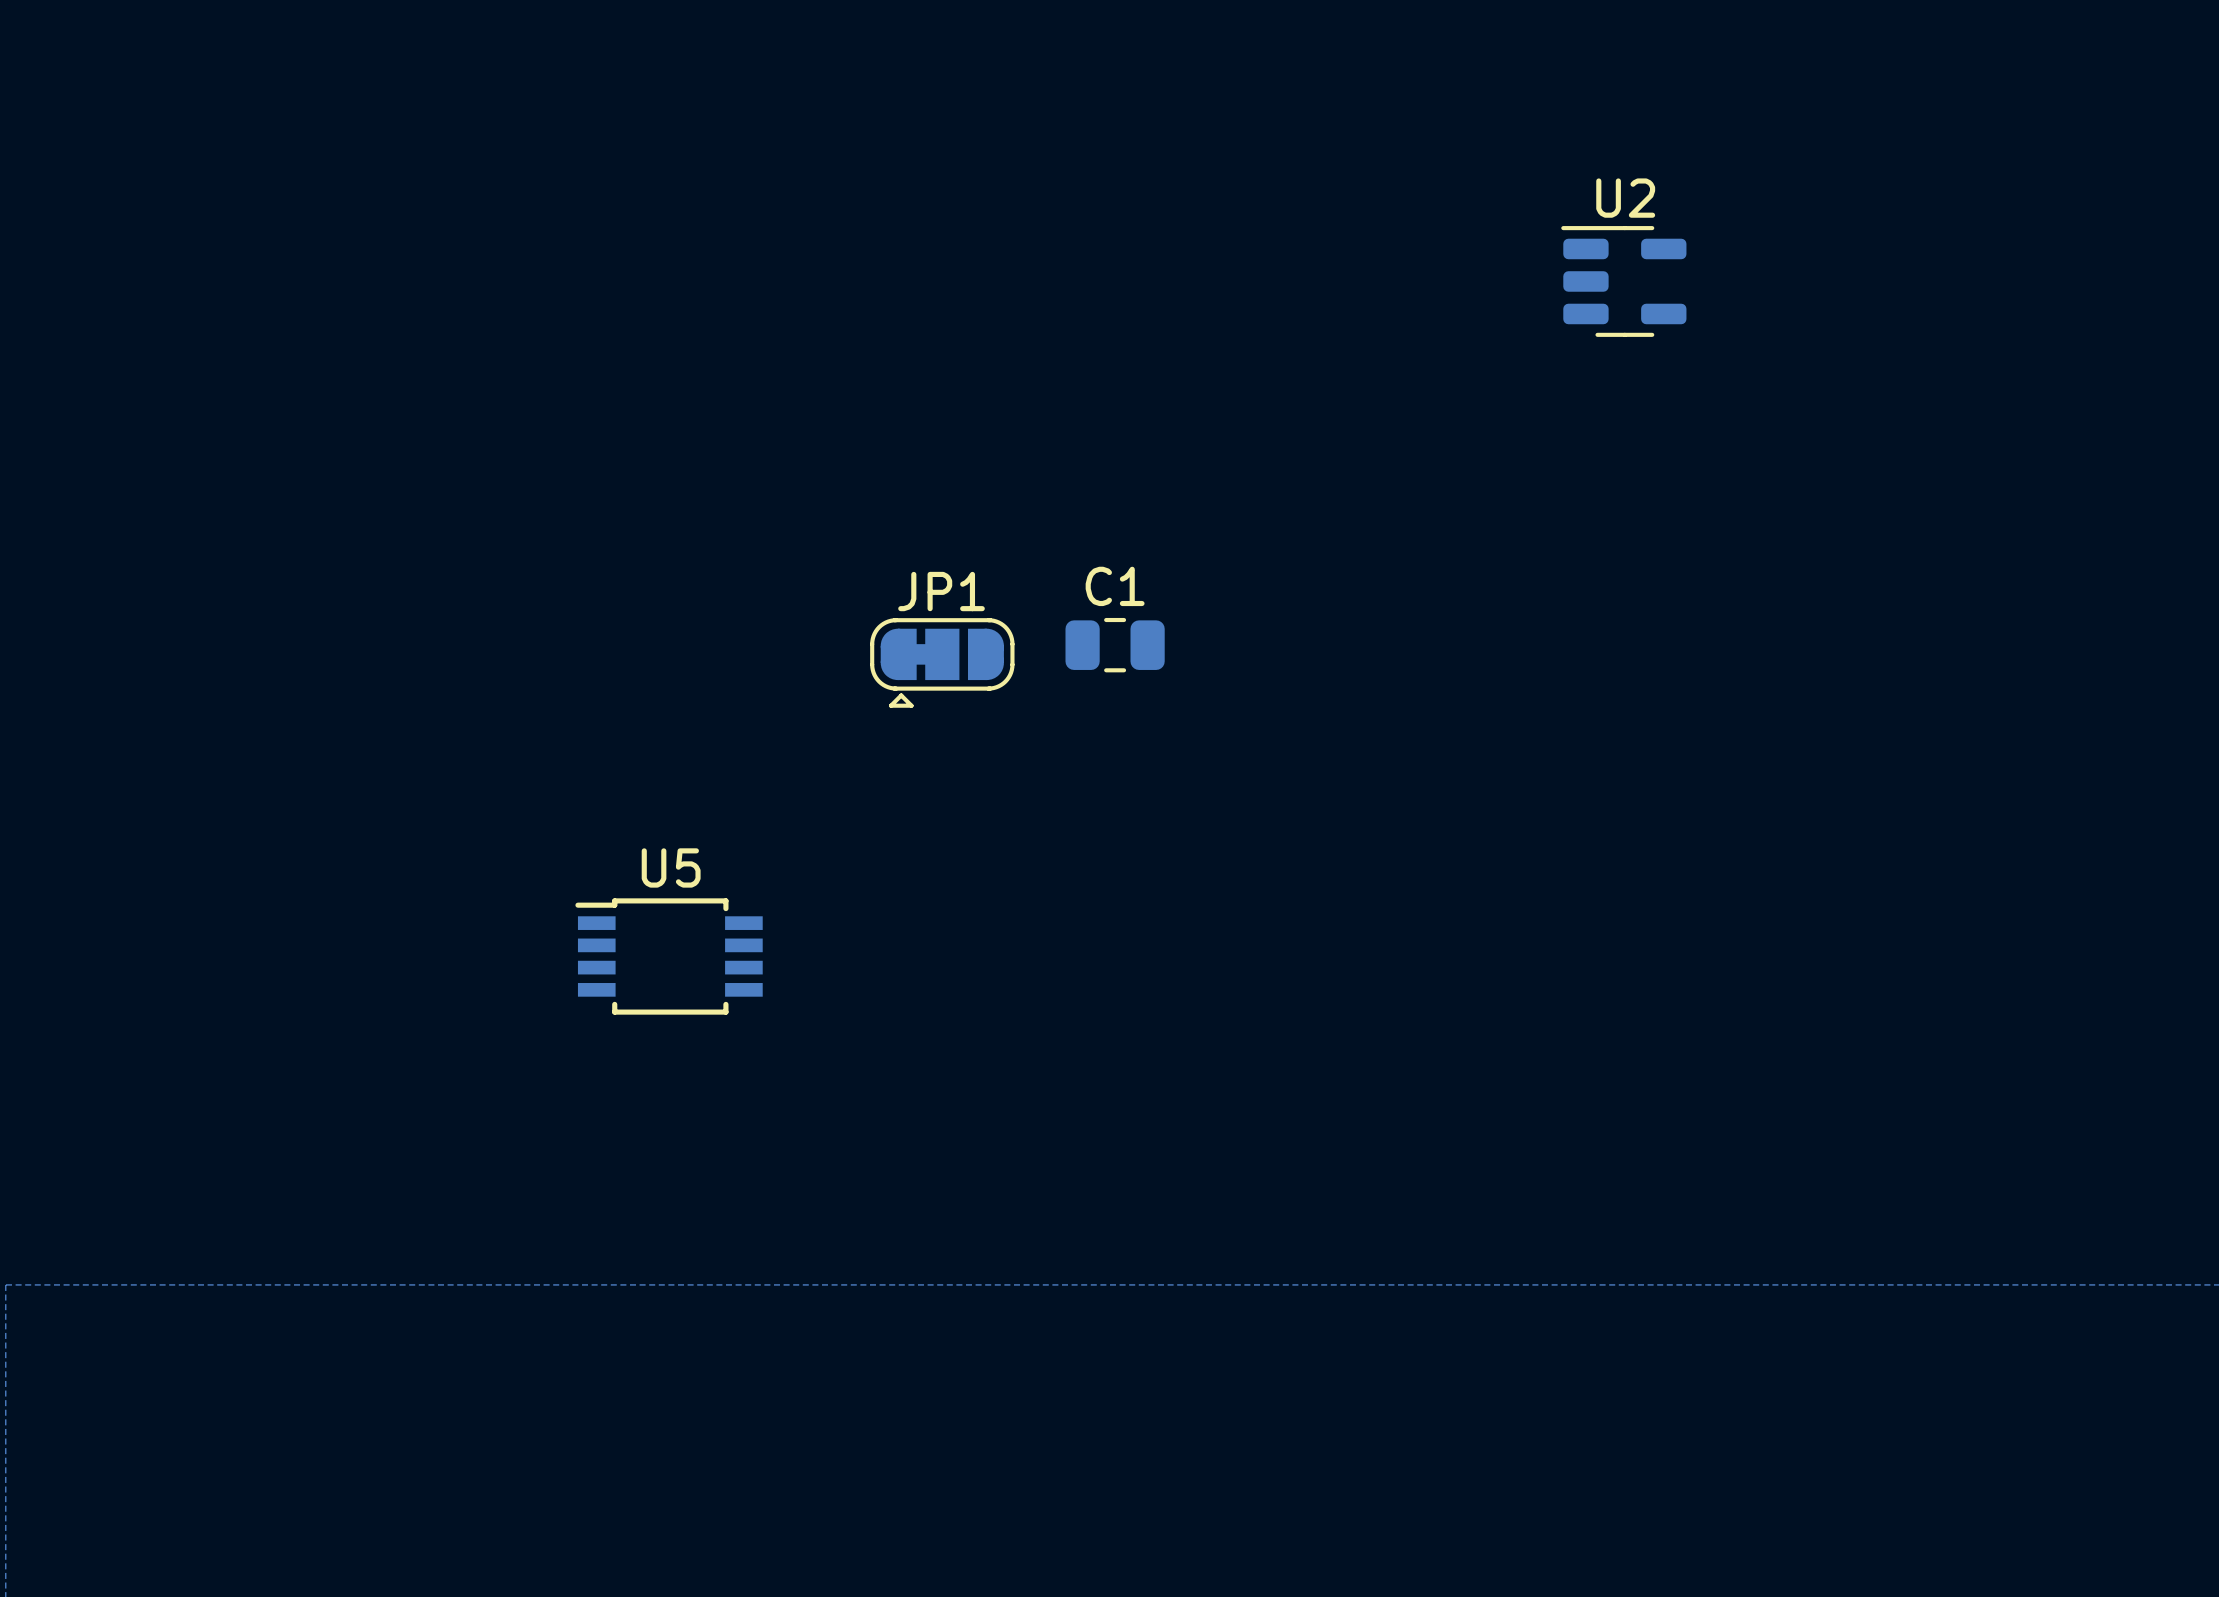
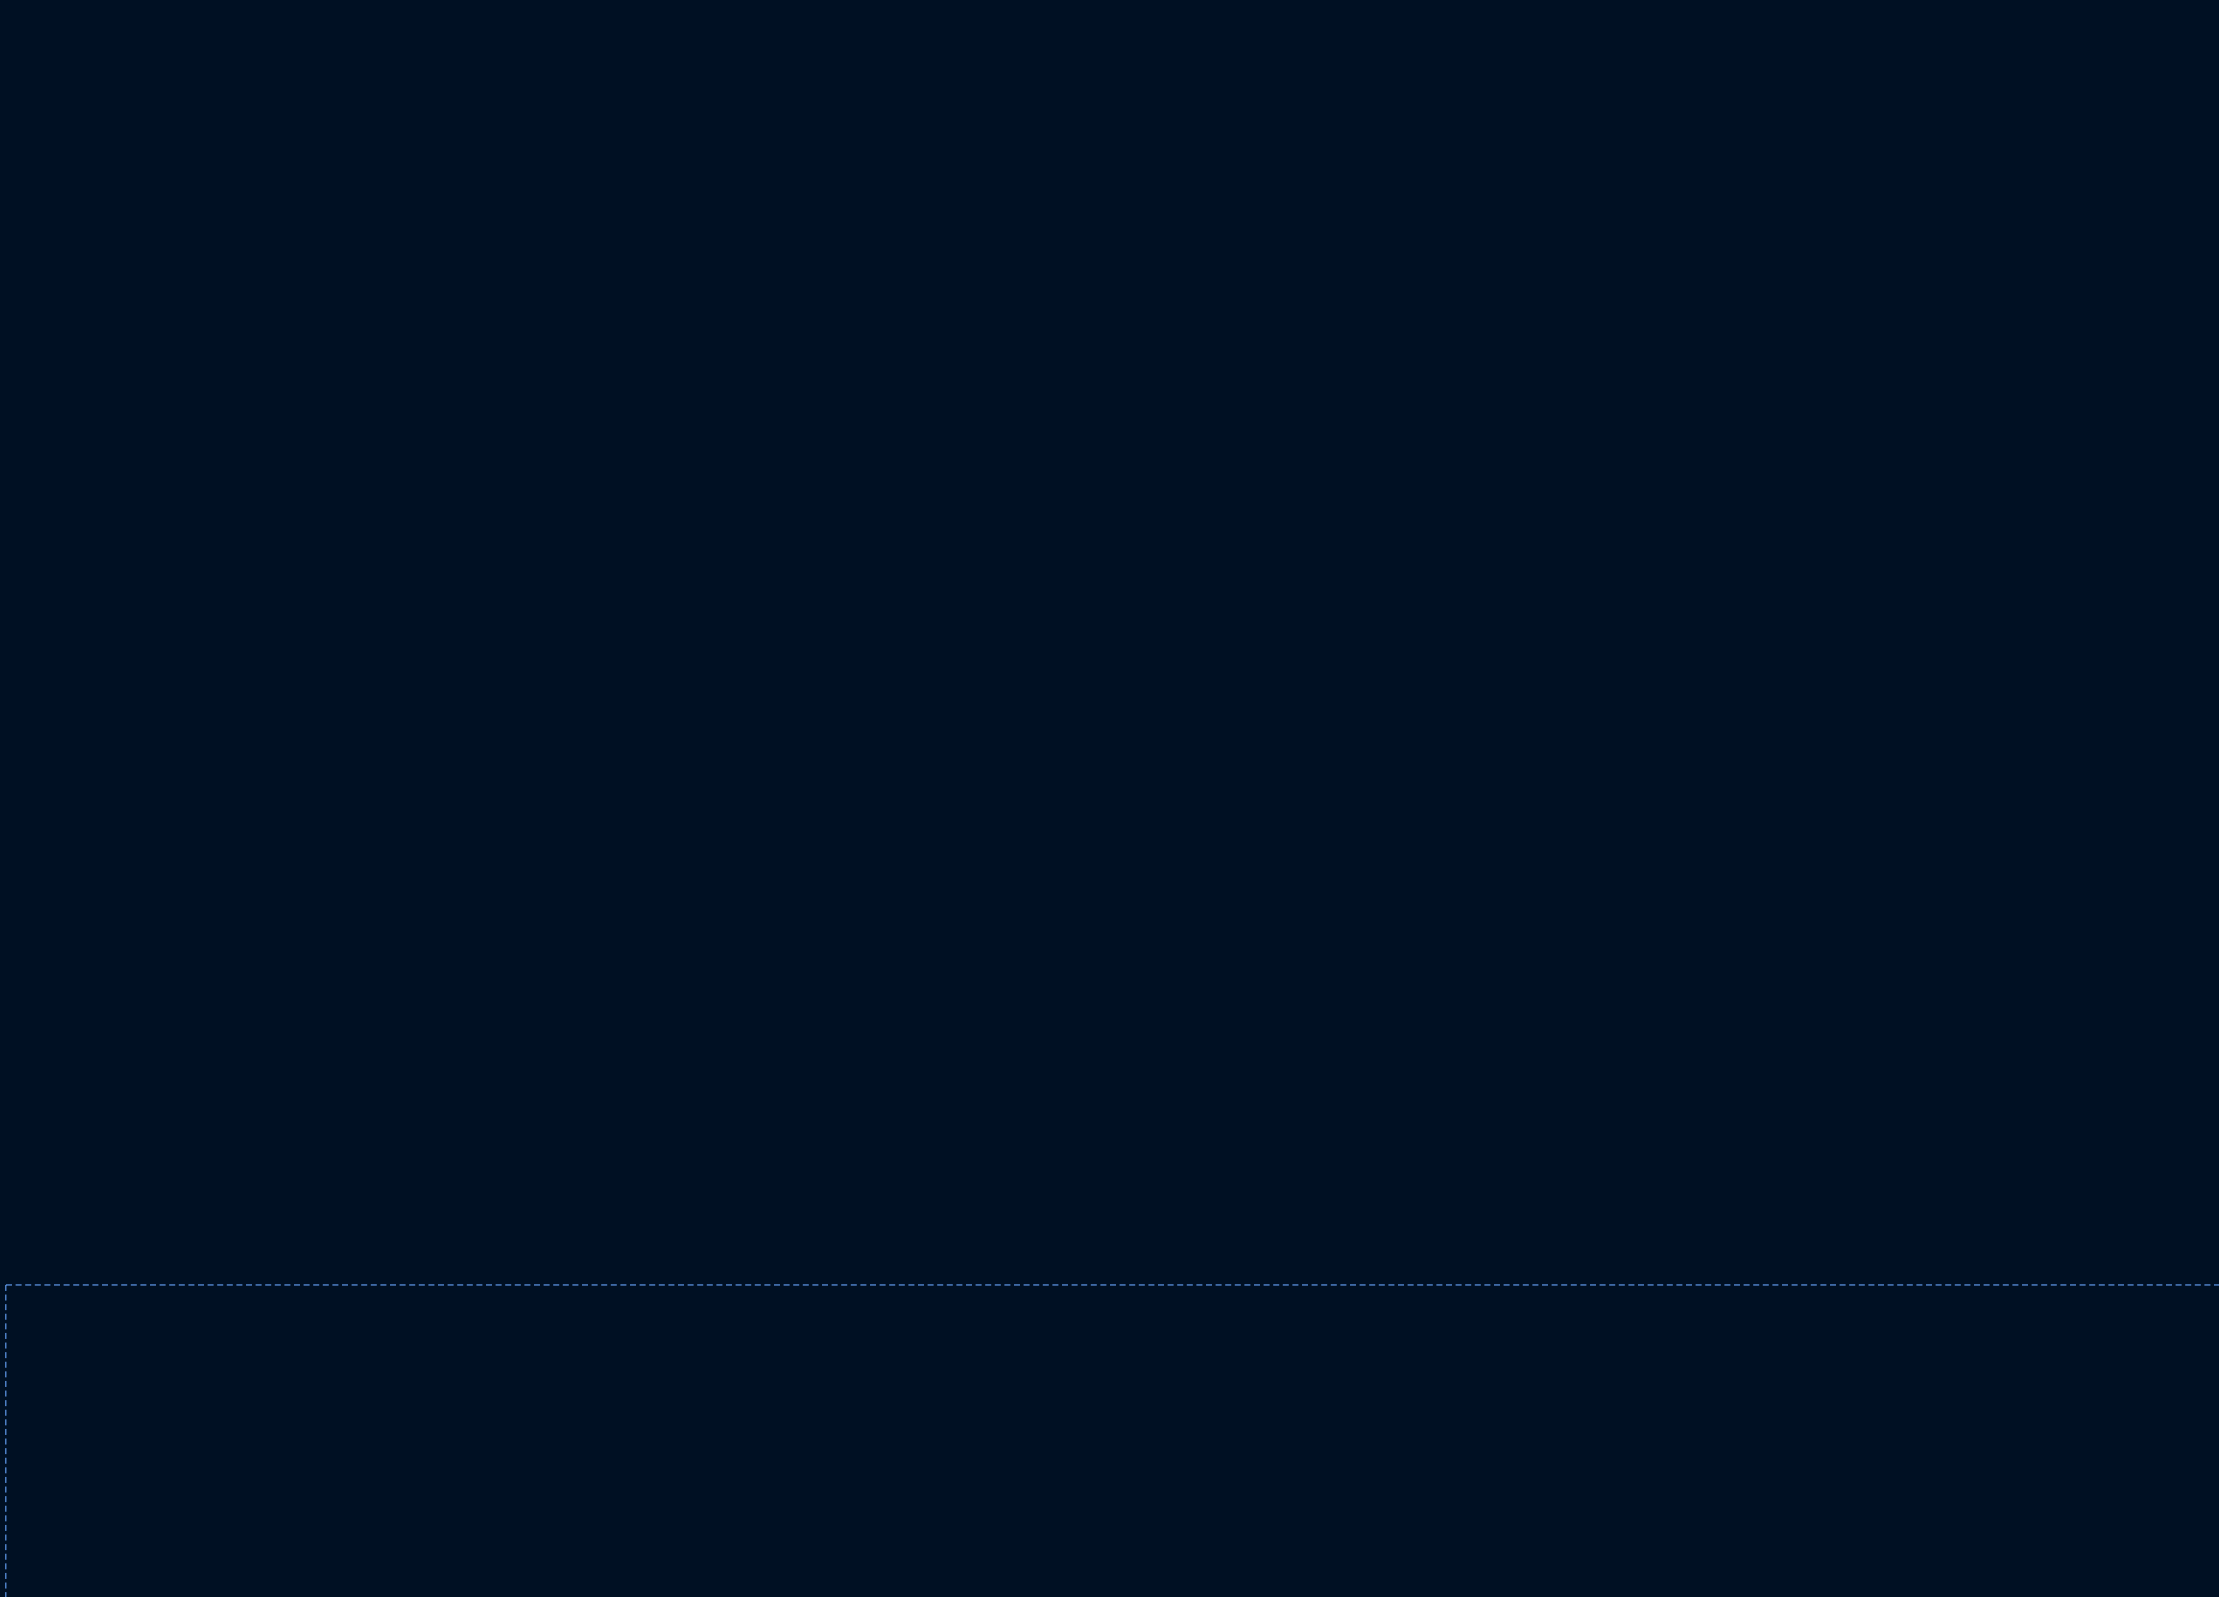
U2: (1623, 281) -> none
C1: (1115, 645) -> none
JP1: (942, 662) -> none
U5: (669, 956) -> none

